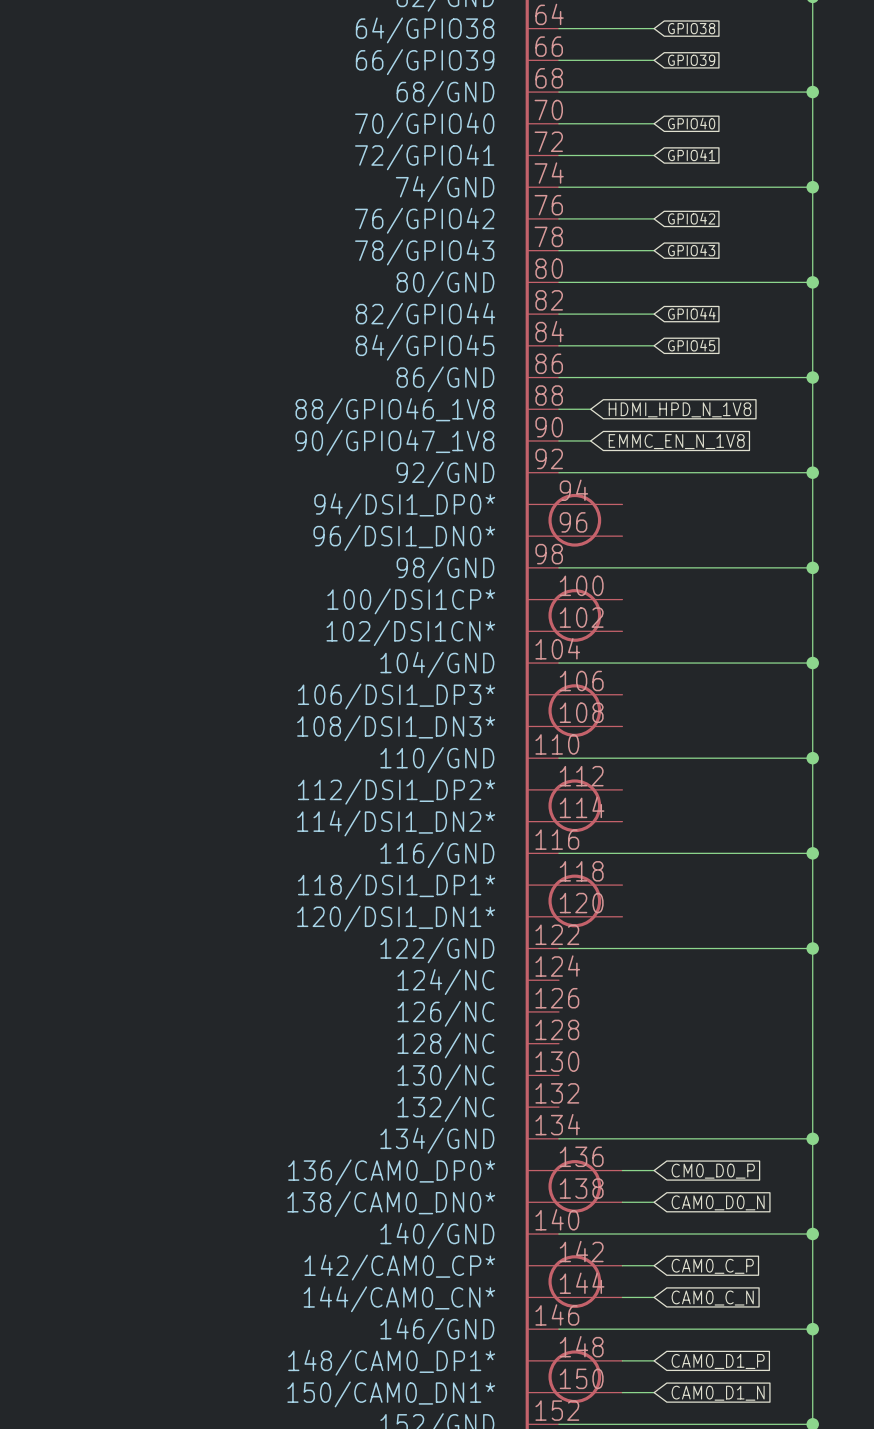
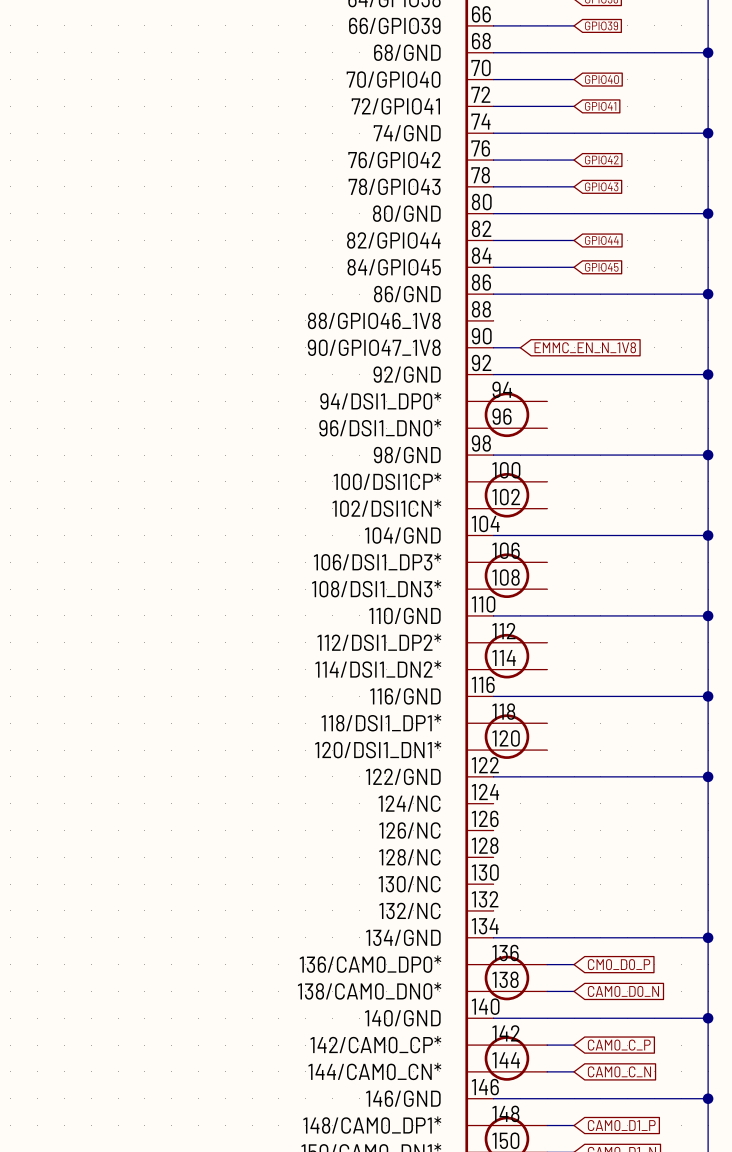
wire: (558, 409) (590, 409) -> none
global label: HDMI_HPD_N_1V8 (679, 409) -> none

